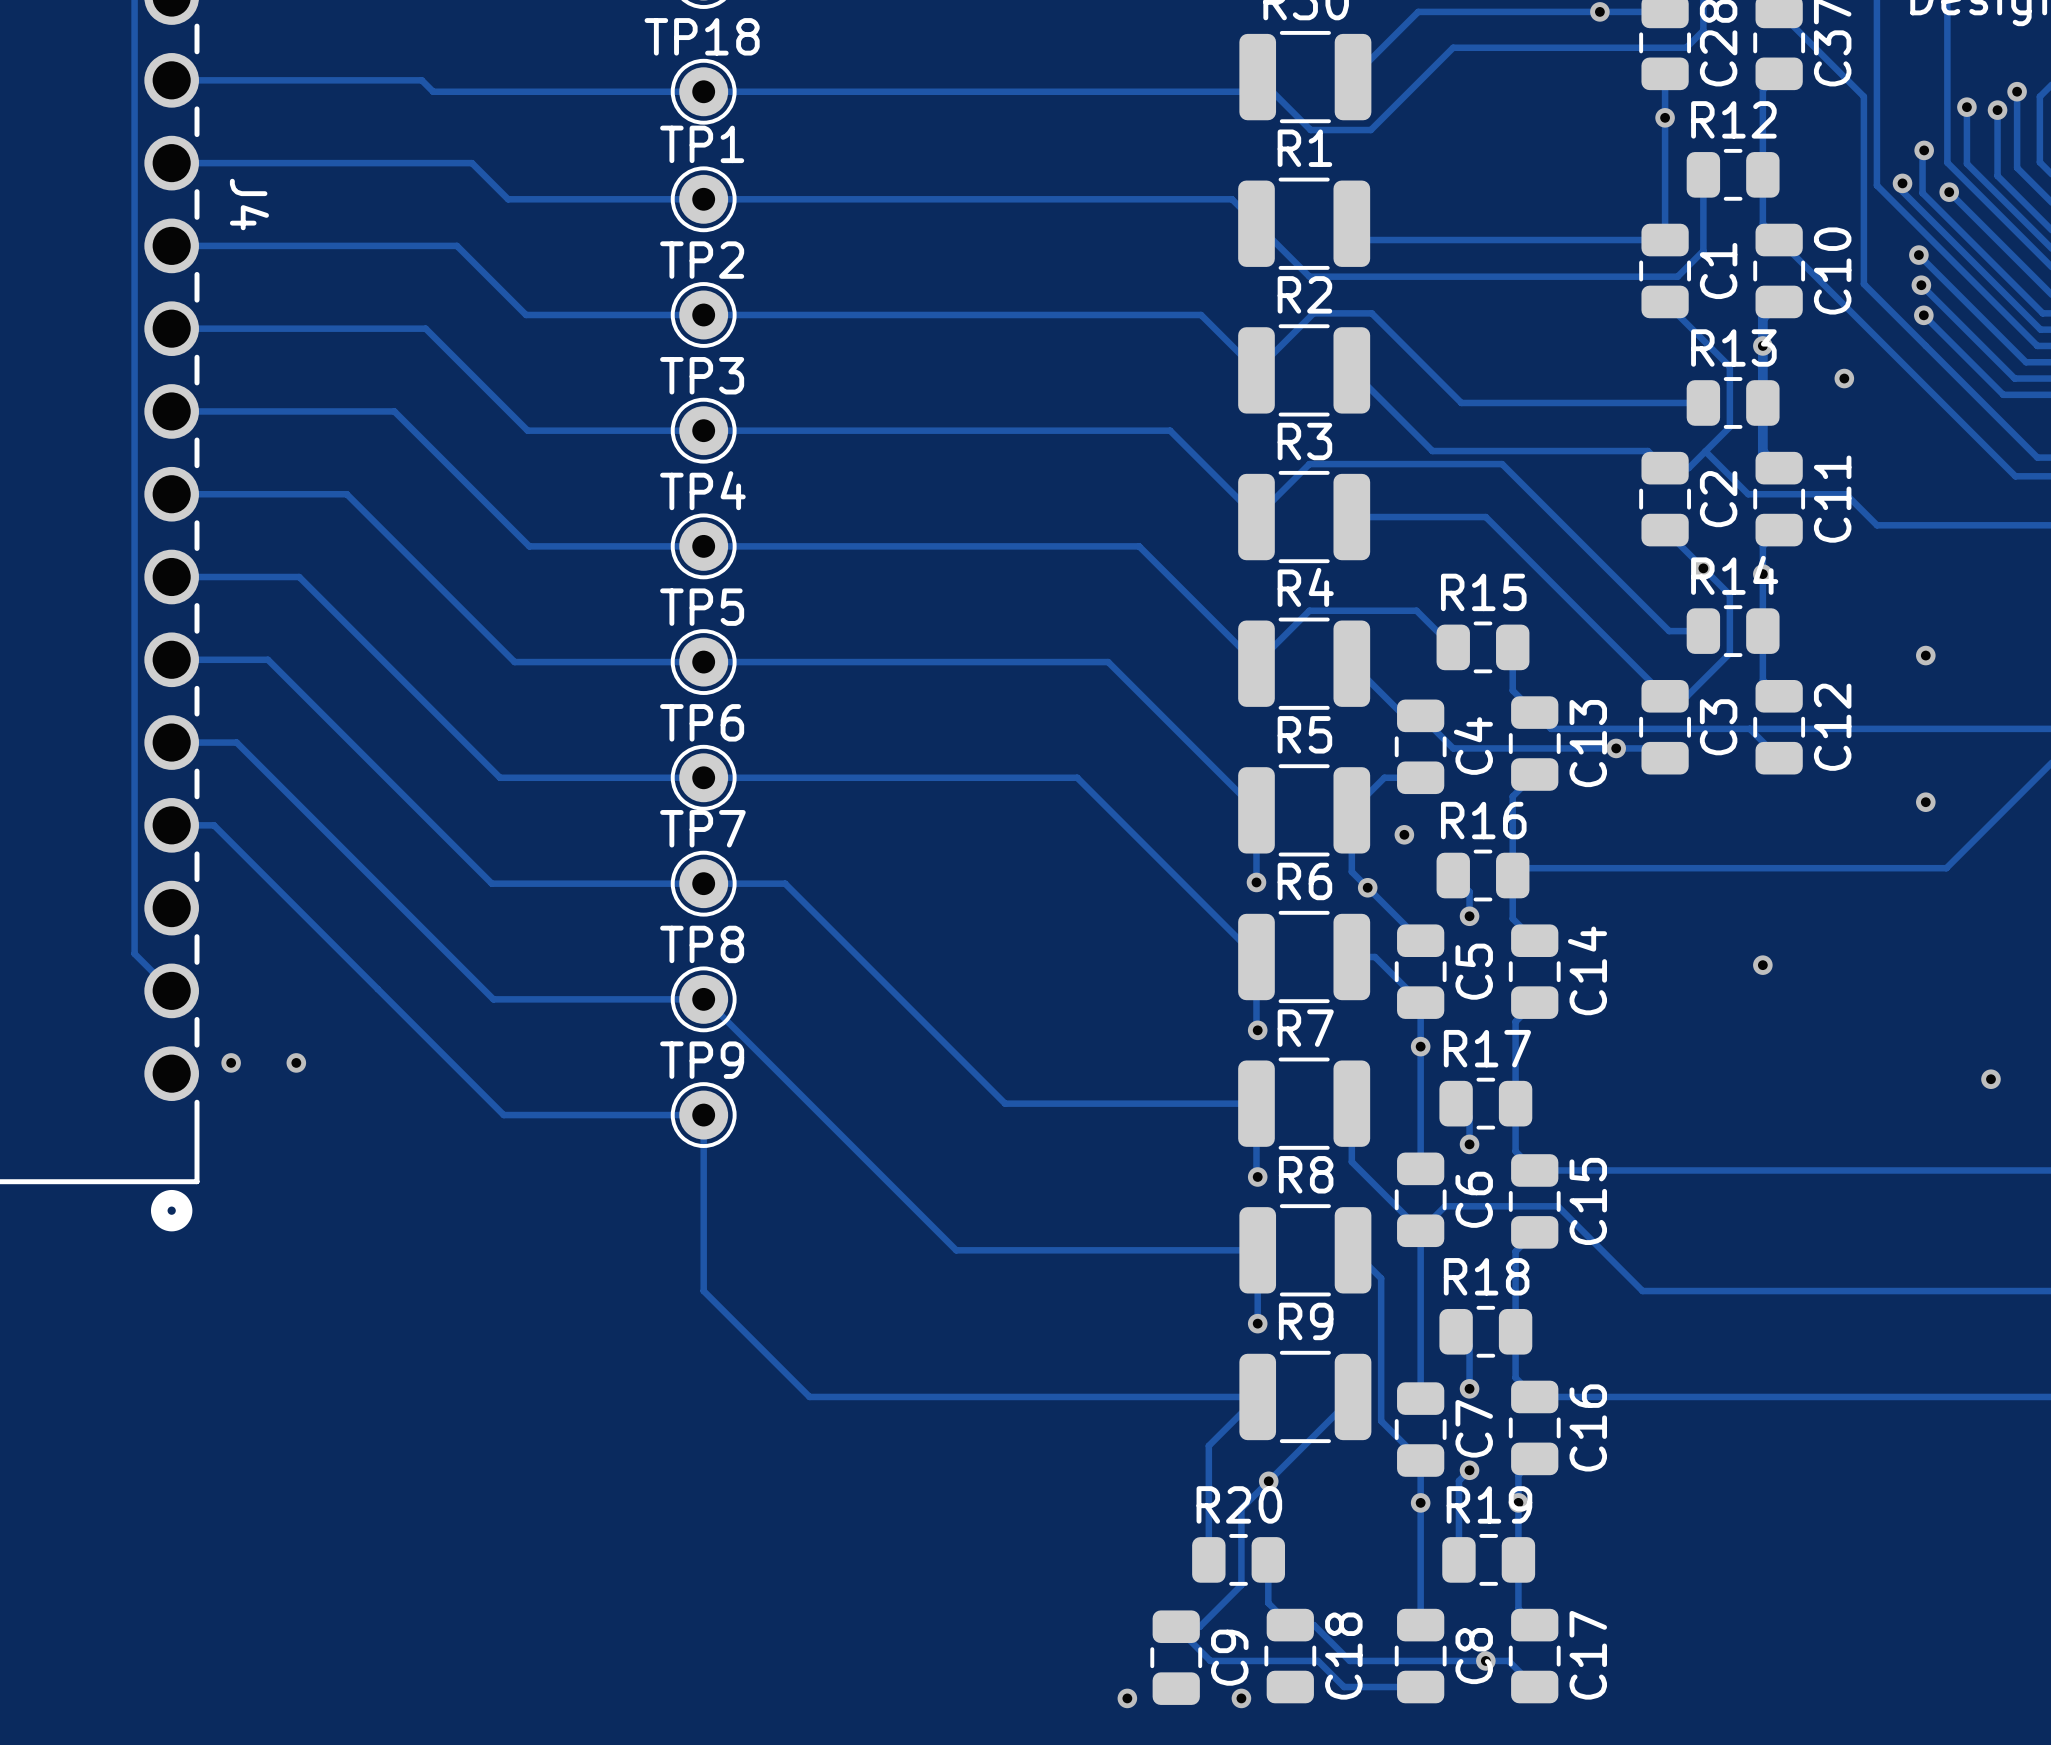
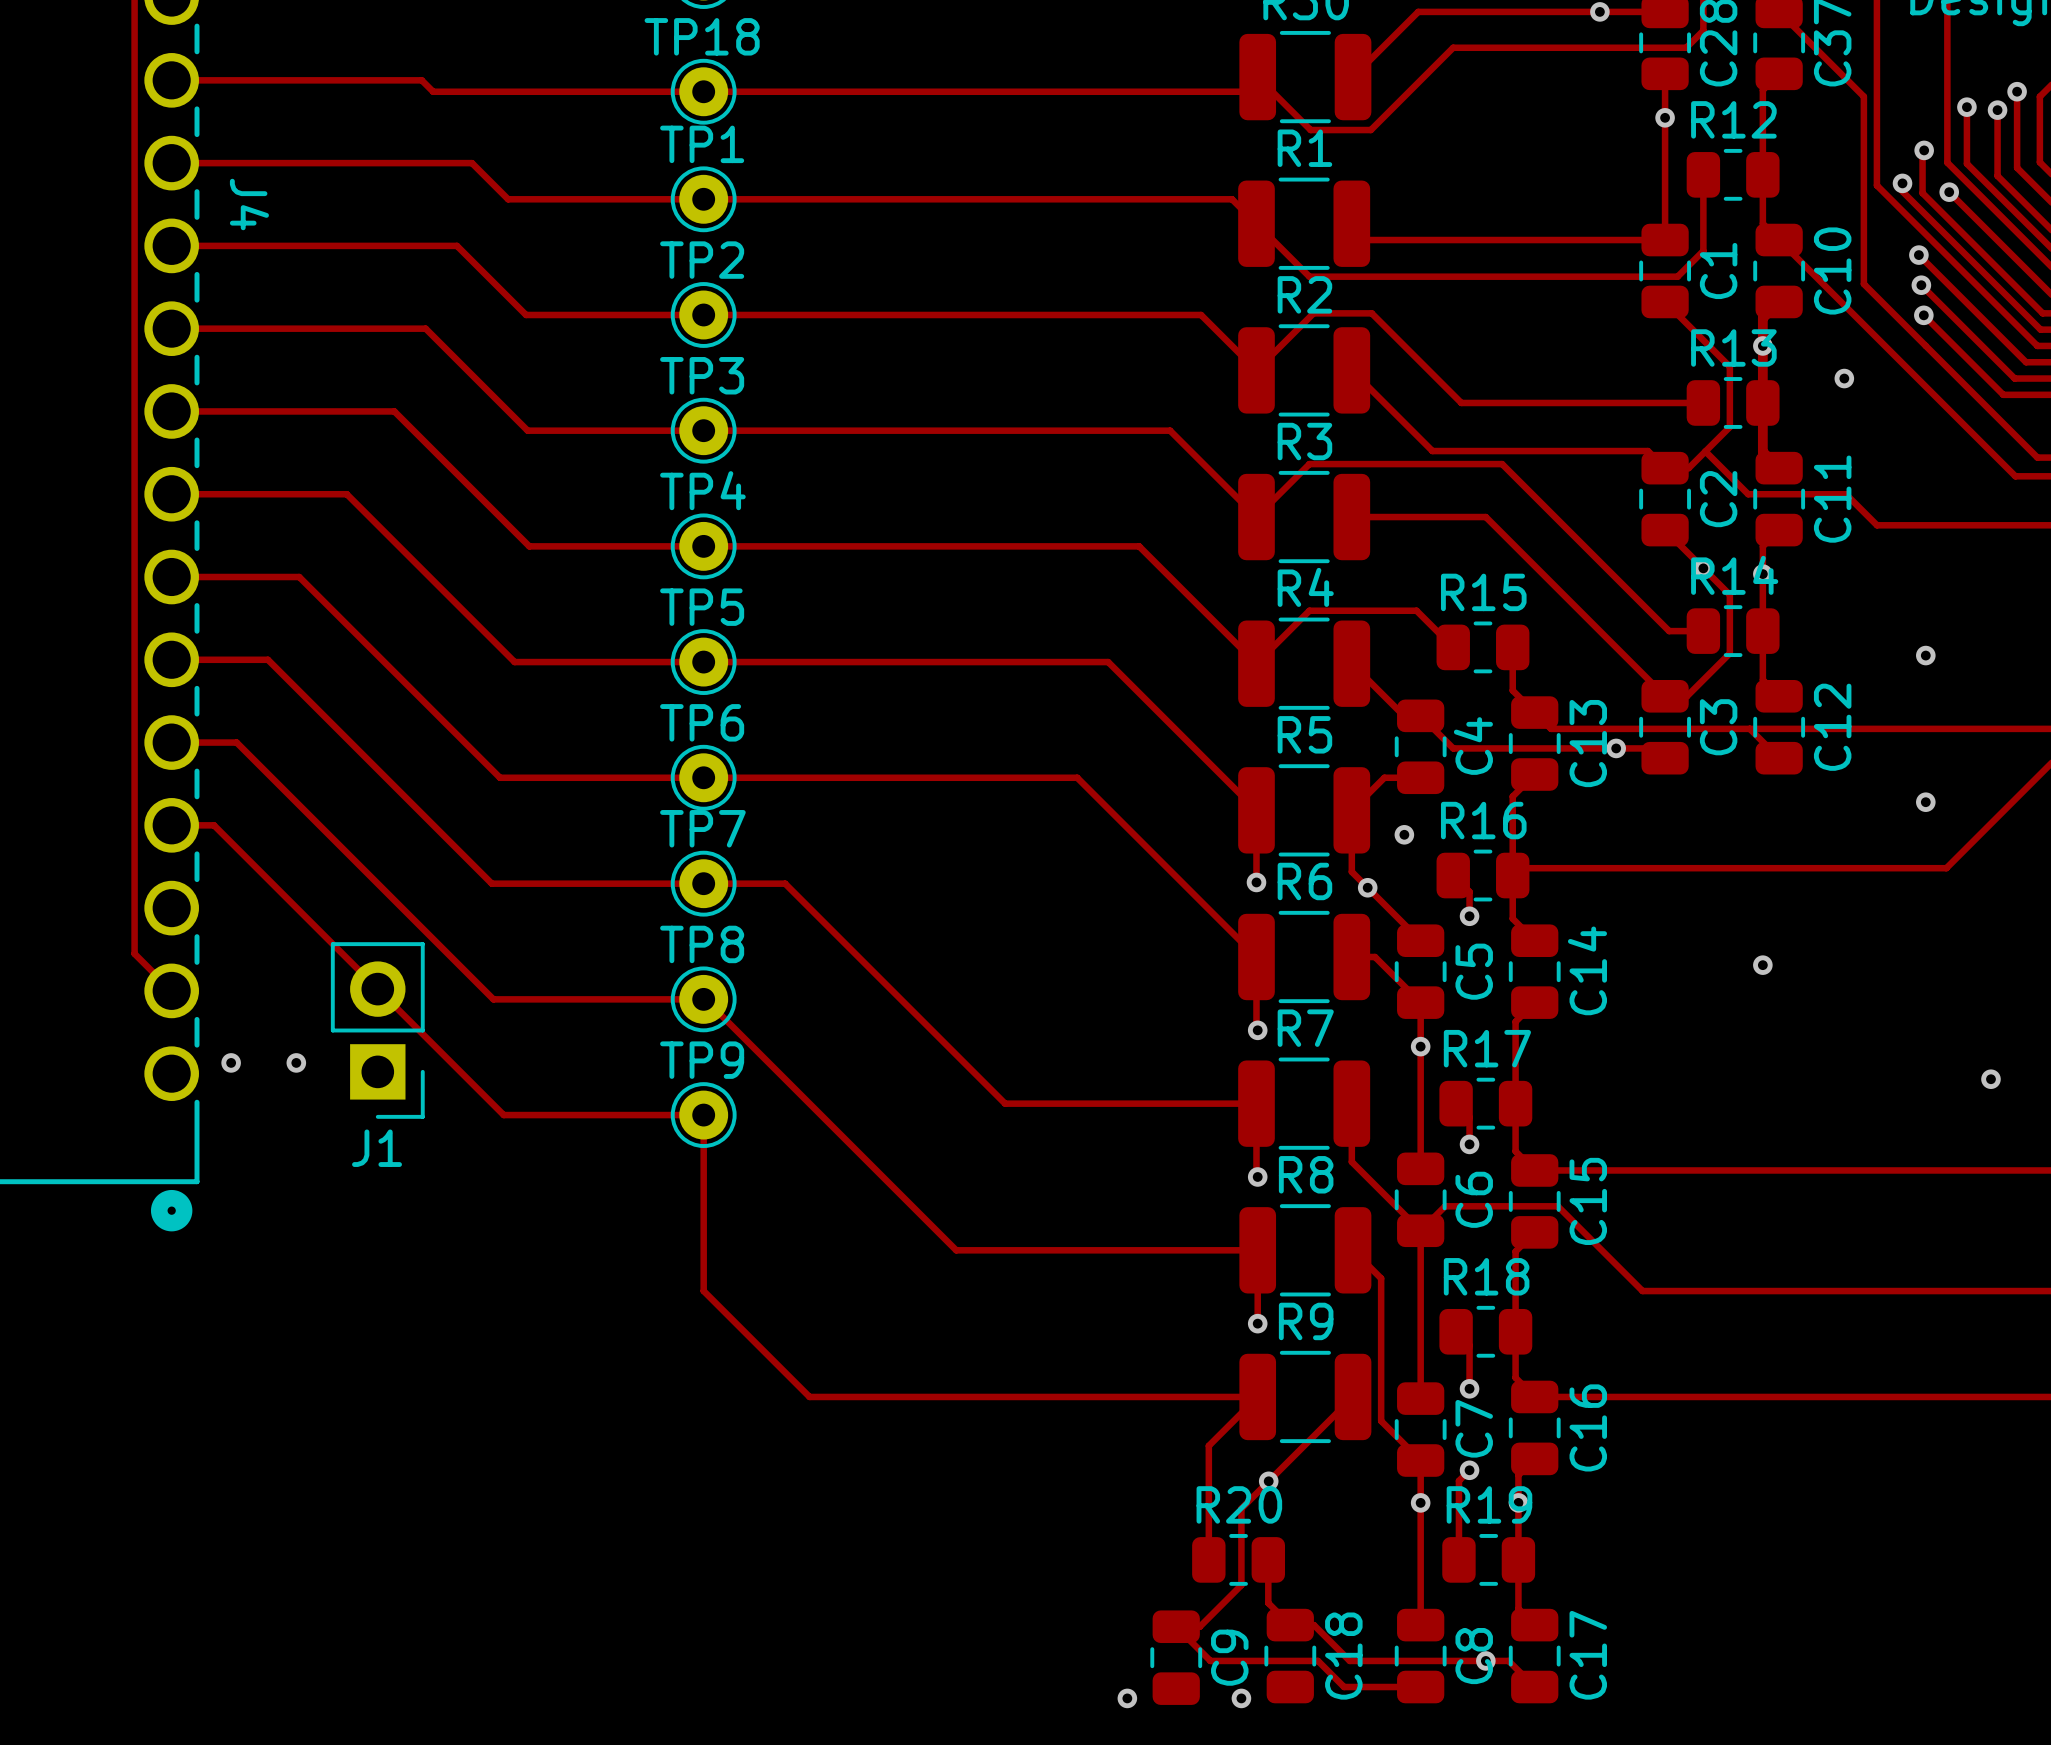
J1: none -> (377, 1030)

